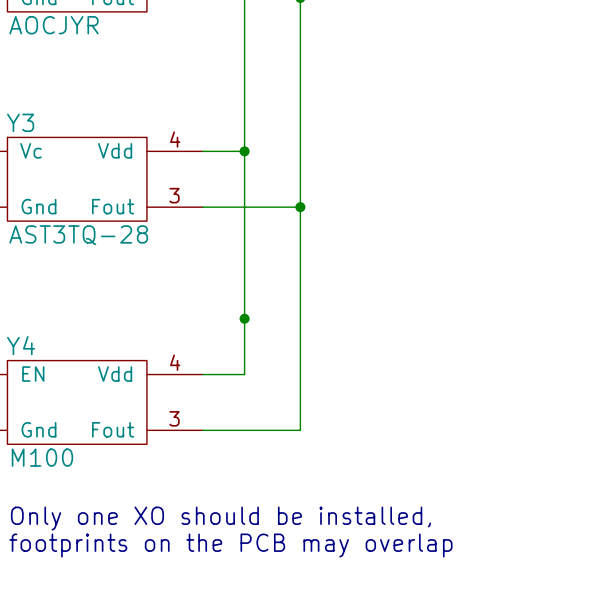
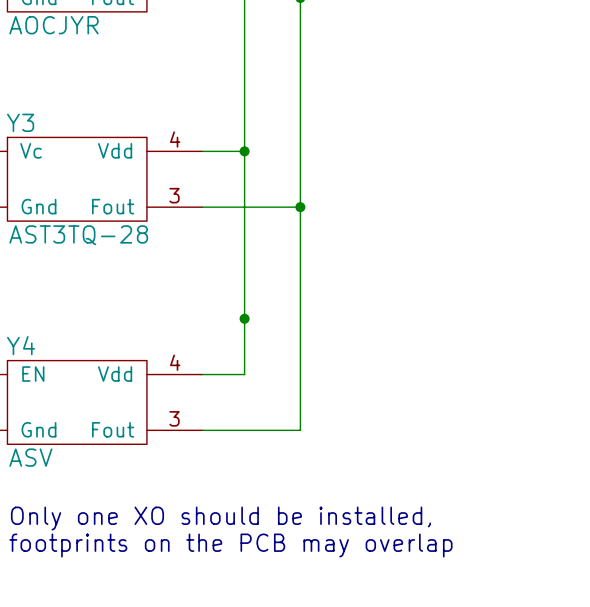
Y4 value: M100 (42, 457) -> ASV (30, 457)

